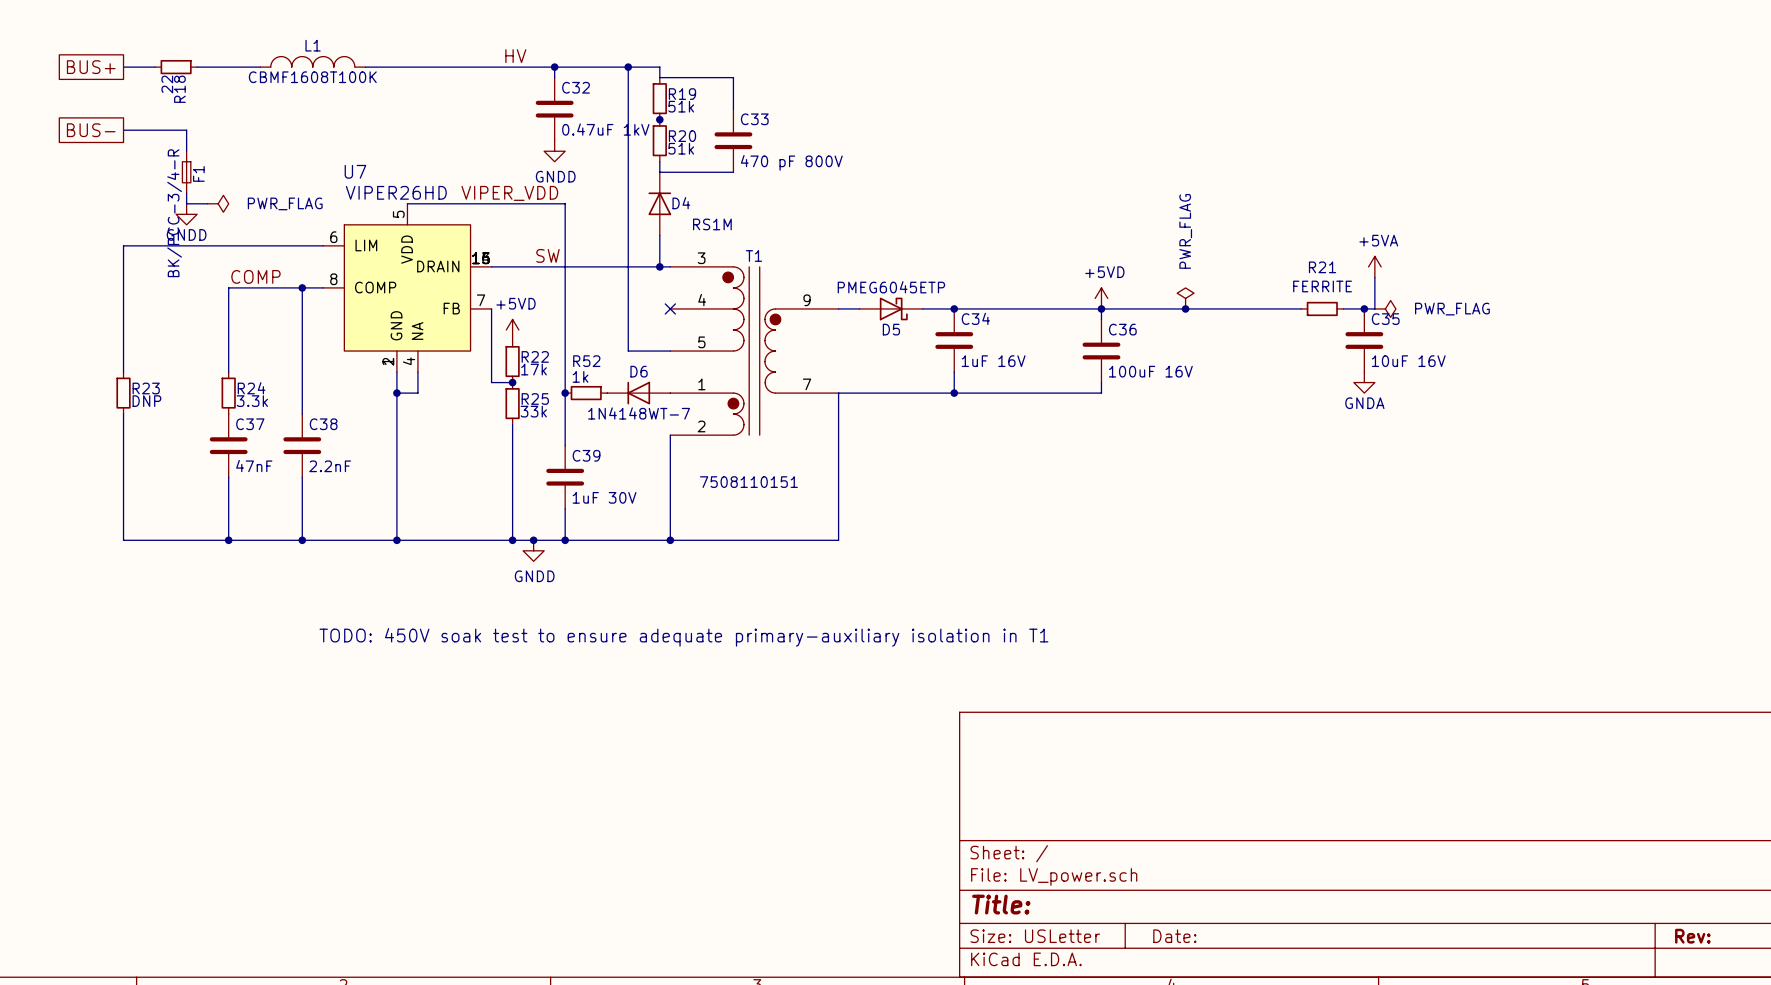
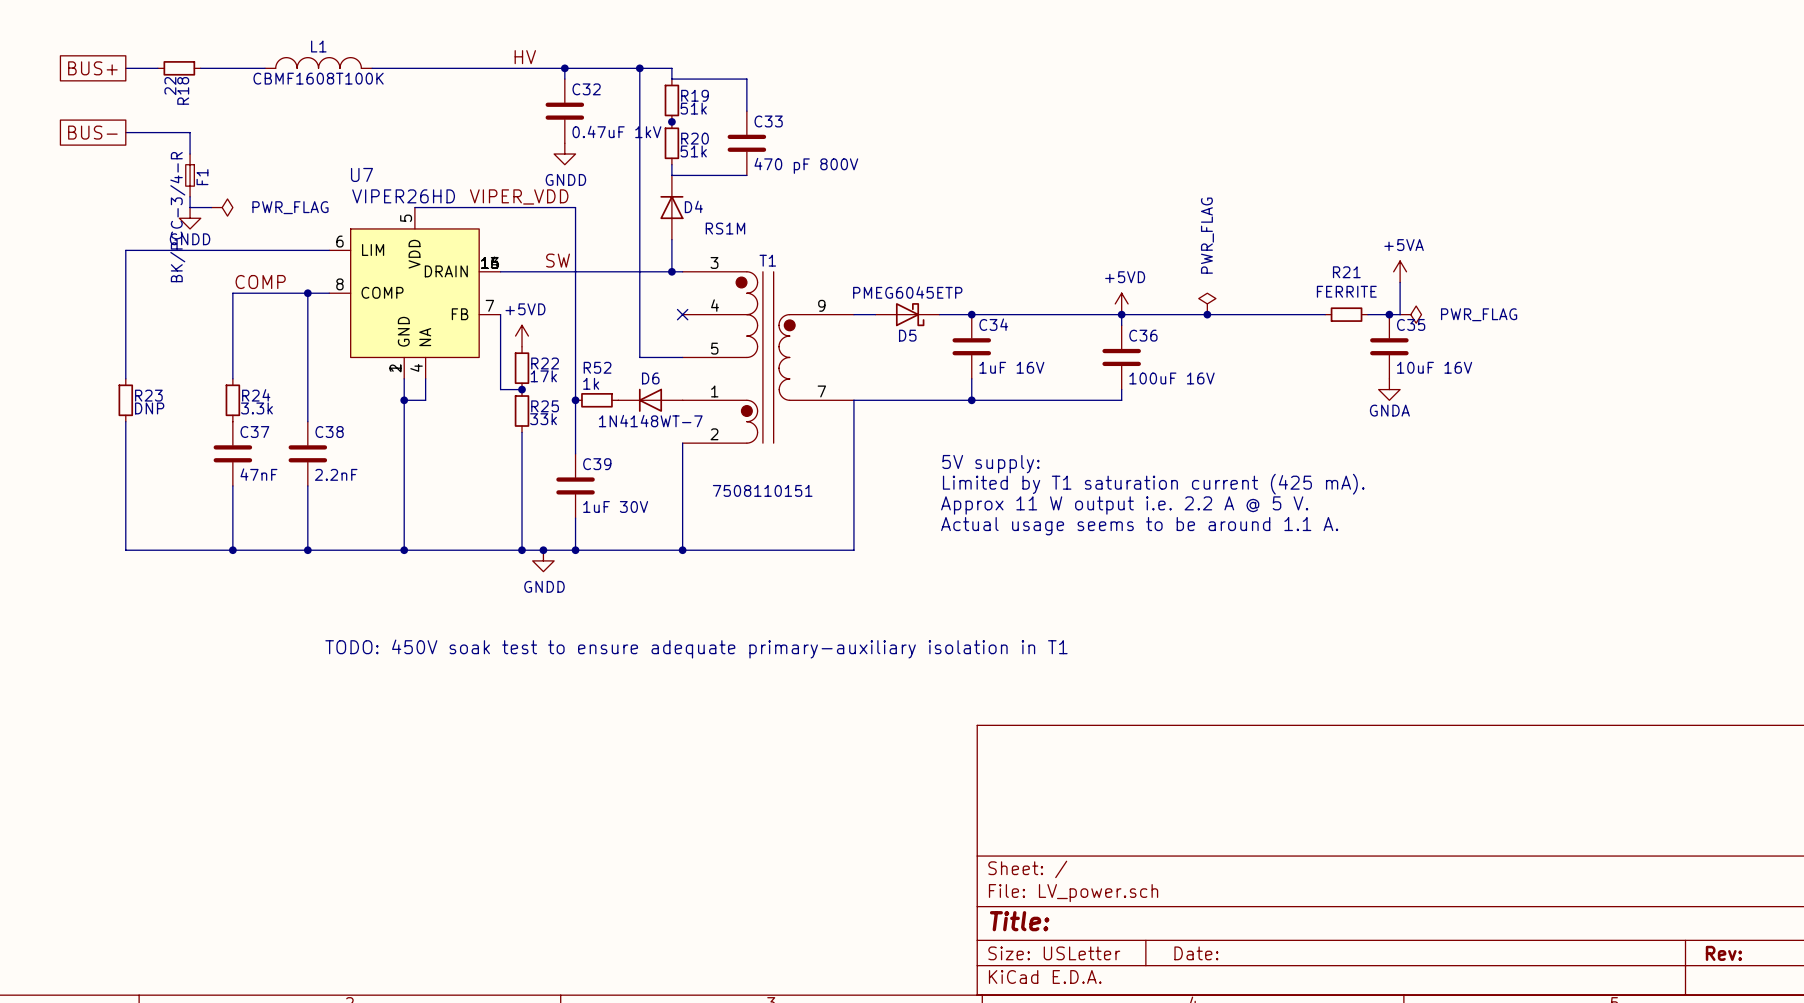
text: none -> 5V supply: (990, 464)
text: none -> Limited by T1 saturation current (425 mA). (1153, 484)
text: none -> Approx 11 W output i.e. 2.2 A @ 5 V. (1124, 505)
text: none -> Actual usage seems to be around 1.1 A. (1139, 526)

